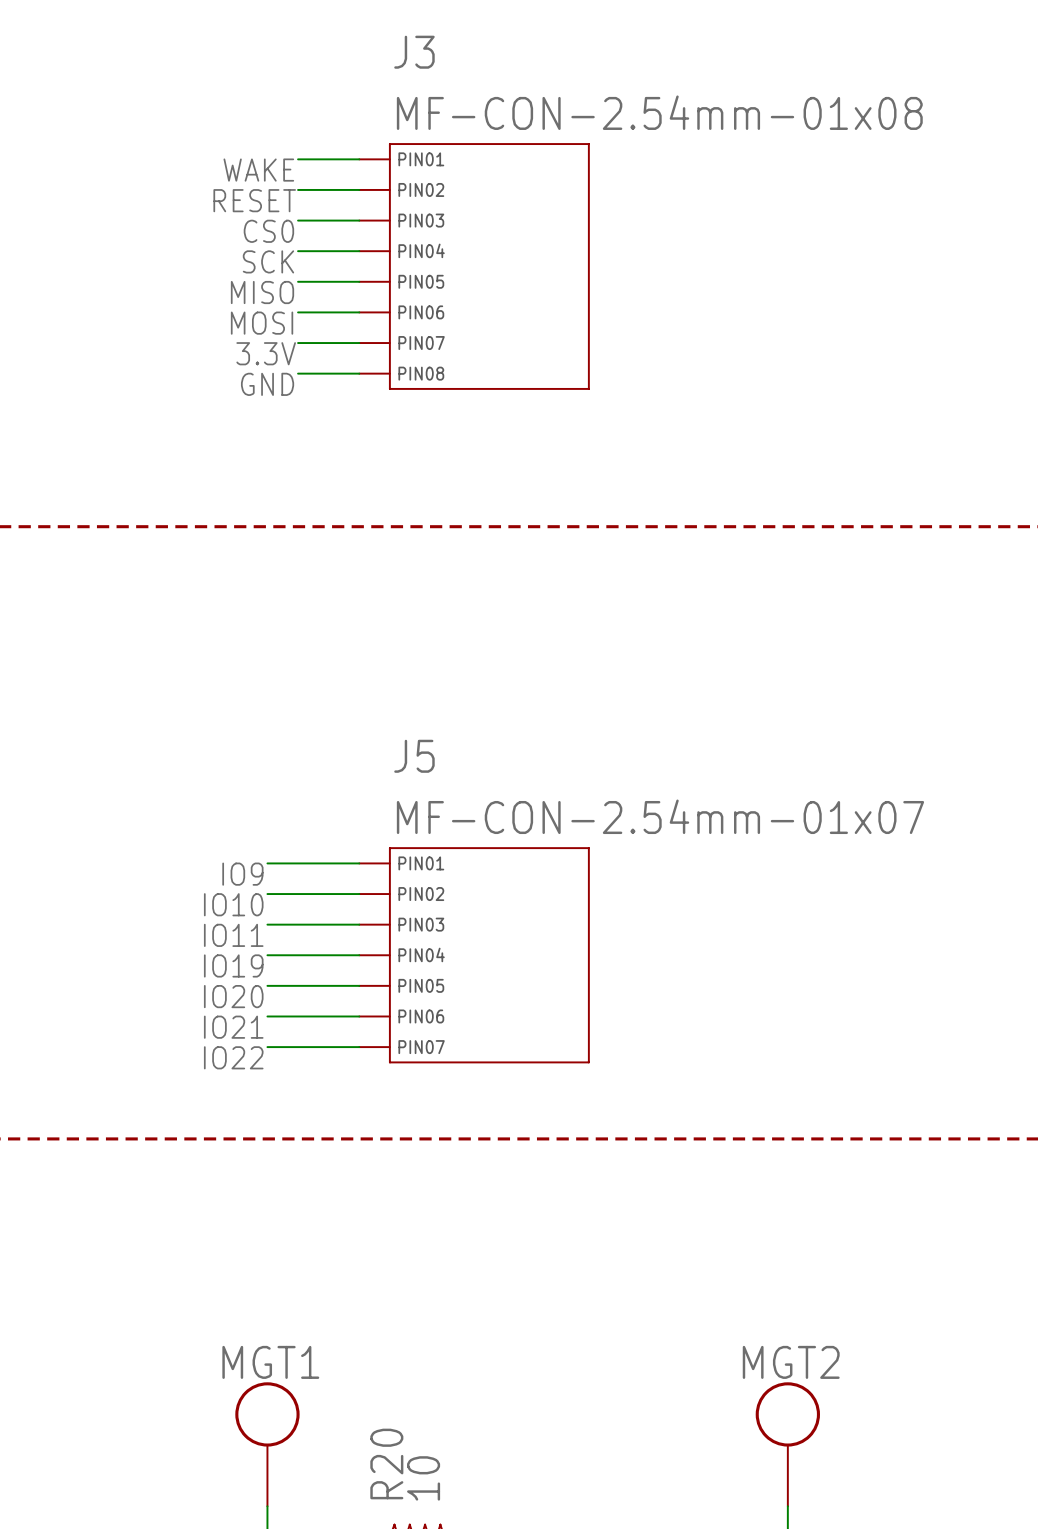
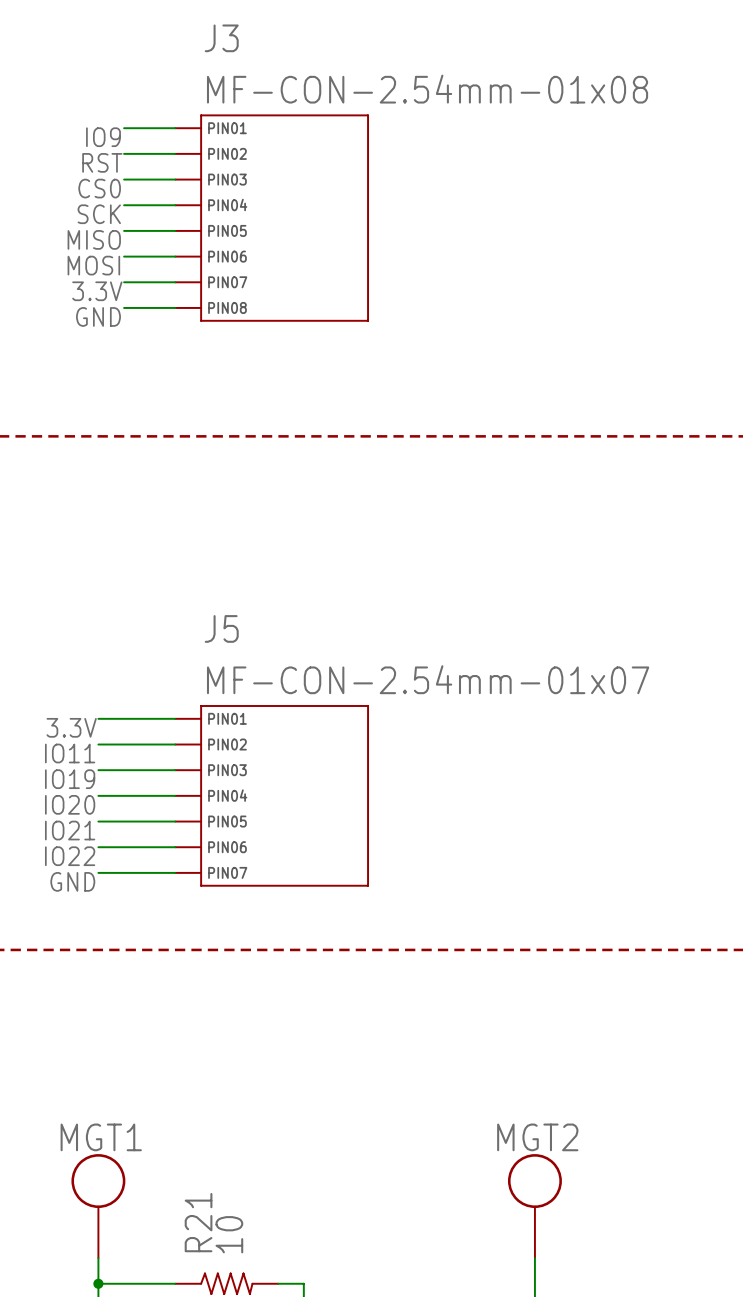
label: WAKE (258, 170) -> IO9 (103, 137)
label: RESET (254, 200) -> RST (102, 162)
label: IO9 (242, 874) -> 3.3V (71, 727)
label: IO10 (233, 904) -> IO11 (70, 753)
label: IO11 (233, 935) -> IO19 (70, 779)
label: IO19 (233, 965) -> IO20 (70, 804)
label: IO20 (233, 996) -> IO21 (70, 830)
label: IO21 (233, 1027) -> IO22 (70, 856)
label: IO22 (233, 1057) -> GND (72, 881)
R20 name: R20 (386, 1463) -> R21 (198, 1222)

